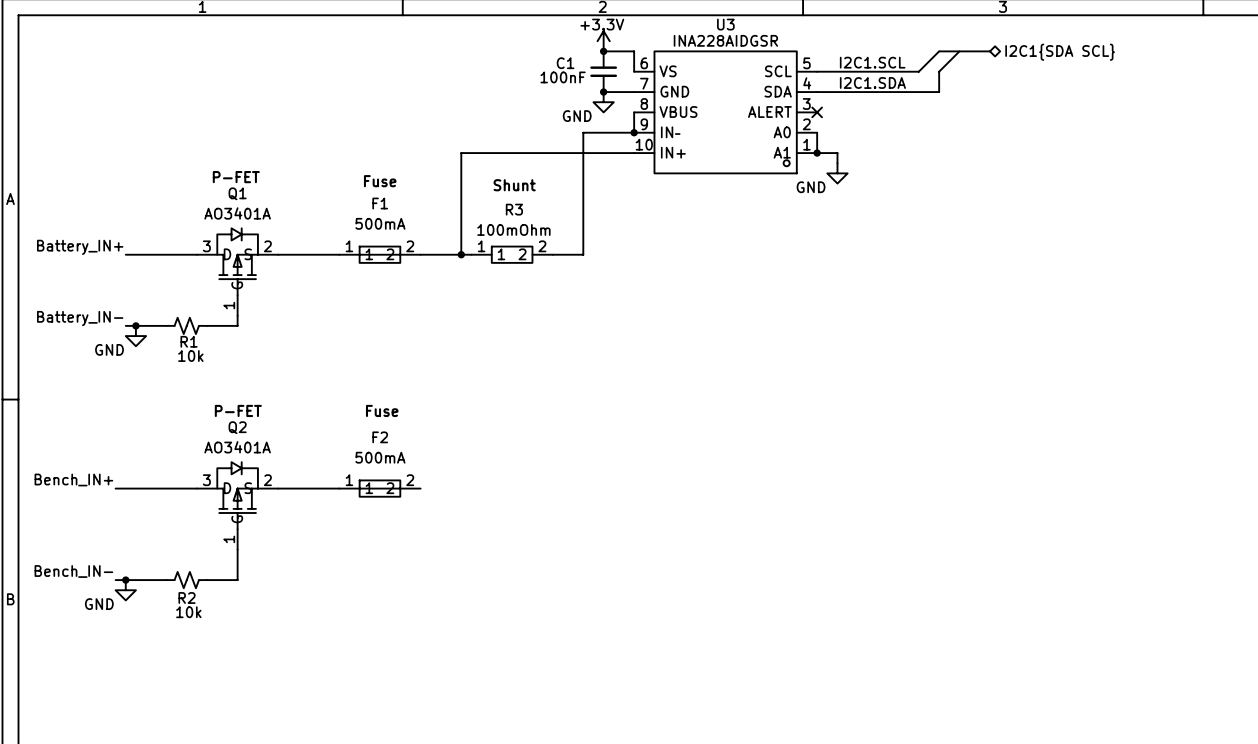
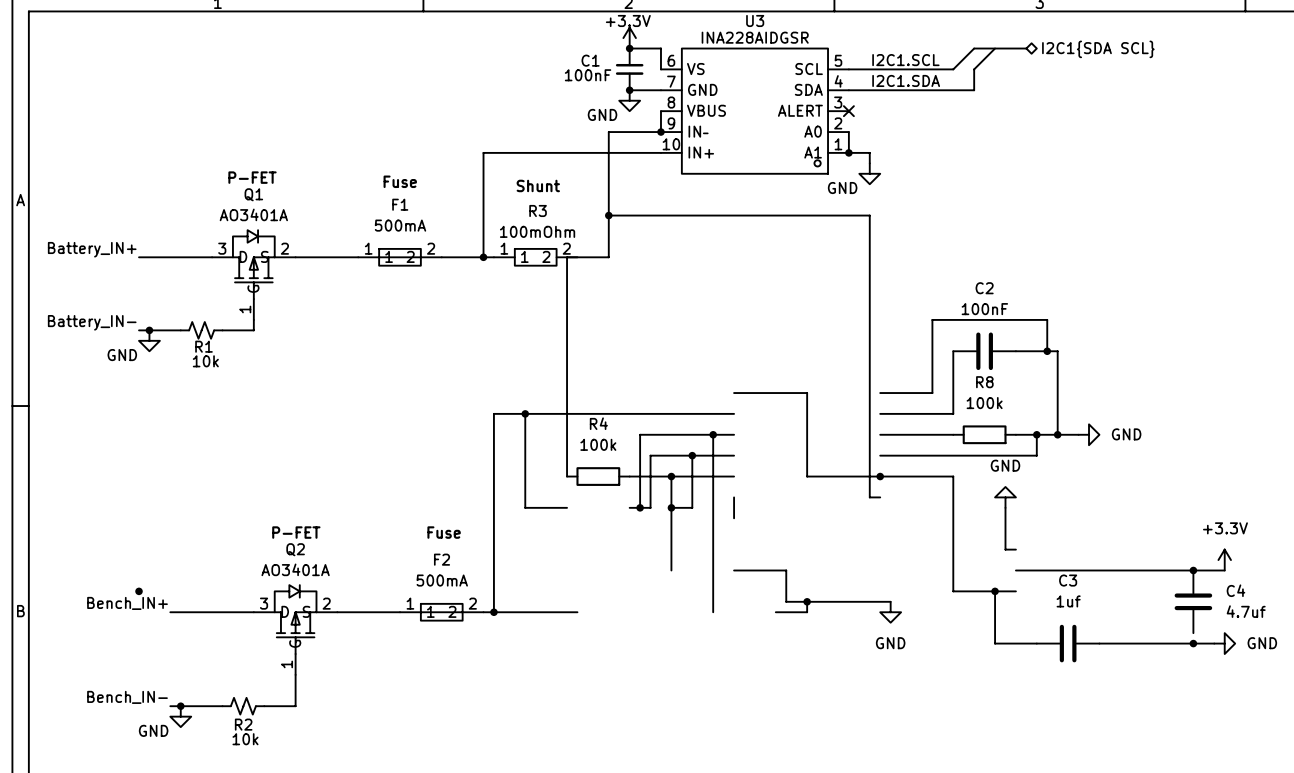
wire: none -> (608, 215) (869, 215) (869, 497) (880, 497)
junction: none -> (608, 215)
wire: none -> (577, 257) (567, 257) (567, 476)
wire: none -> (953, 351) (953, 413) (880, 413)
C2: none -> 100nF (984, 351)
wire: none -> (1015, 351) (1057, 351) (1057, 434)
wire: none -> (1047, 351) (1047, 319) (932, 319) (932, 393) (880, 393)
junction: none -> (1047, 351)
wire: none -> (734, 393) (807, 393) (807, 476) (953, 476) (953, 591) (1015, 591)
wire: none -> (525, 413) (525, 507) (567, 507)
junction: none -> (525, 413)
wire: none -> (734, 413) (493, 413) (493, 612)
text position: P-FET (238, 410) -> P-FET (296, 532)
text position: Fuse (382, 410) -> Fuse (444, 532)
wire: none -> (713, 434) (713, 612)
junction: none -> (713, 434)
wire: none -> (734, 434) (640, 434) (640, 507)
wire: none -> (880, 434) (953, 434)
R8: none -> 100k (984, 434)
wire: none -> (1015, 434) (1078, 434)
wire: none -> (1036, 434) (1036, 455) (880, 455)
junction: none -> (1036, 434)
junction: none -> (1057, 434)
power symbol: none -> GND (1089, 434)
wire: none -> (692, 455) (692, 507) (671, 507)
junction: none -> (692, 455)
wire: none -> (734, 455) (650, 455) (650, 507) (629, 507)
R4: none -> 100k (598, 476)
wire: none -> (629, 476) (734, 476)
wire: none -> (671, 476) (671, 570)
junction: none -> (671, 476)
junction: none -> (880, 476)
label position: Bench_IN+ (73, 479) -> Bench_IN+ (127, 603)
wire: (115, 488) (196, 488) -> (170, 612) (253, 612)
wire: (278, 488) (339, 488) -> (337, 612) (400, 612)
F2 position: (379, 488) -> (441, 612)
wire: none -> (734, 497) (734, 518)
power symbol: none -> GND (1005, 497)
junction: none -> (640, 507)
junction: none -> (671, 507)
wire: none -> (1005, 507) (1005, 549) (1015, 549)
Q2 position: (237, 505) -> (295, 630)
wire: (237, 549) (237, 580) (207, 580) -> (295, 674) (295, 706) (264, 706)
power symbol: none -> +3.3V (1224, 560)
wire: none -> (734, 570) (786, 570) (786, 601) (890, 601)
wire: none -> (1015, 570) (1224, 570)
junction: none -> (1193, 570)
label position: Bench_IN- (73, 571) -> Bench_IN- (127, 697)
wire: (115, 580) (166, 580) -> (170, 706) (222, 706)
R2 position: (186, 580) -> (243, 706)
wire: none -> (995, 591) (995, 643) (1036, 643)
junction: none -> (995, 591)
power symbol position: GND (125, 590) -> GND (180, 716)
wire: none -> (807, 601) (807, 612) (775, 612)
junction: none -> (807, 601)
C4: none -> 4.7uf (1193, 601)
wire: none -> (483, 612) (577, 612)
junction: none -> (493, 612)
power symbol: none -> GND (890, 612)
C3: none -> 1uf (1068, 643)
wire: none -> (1099, 643) (1214, 643)
junction: none -> (1193, 643)
power symbol: none -> GND (1224, 643)
junction: none -> (180, 706)

